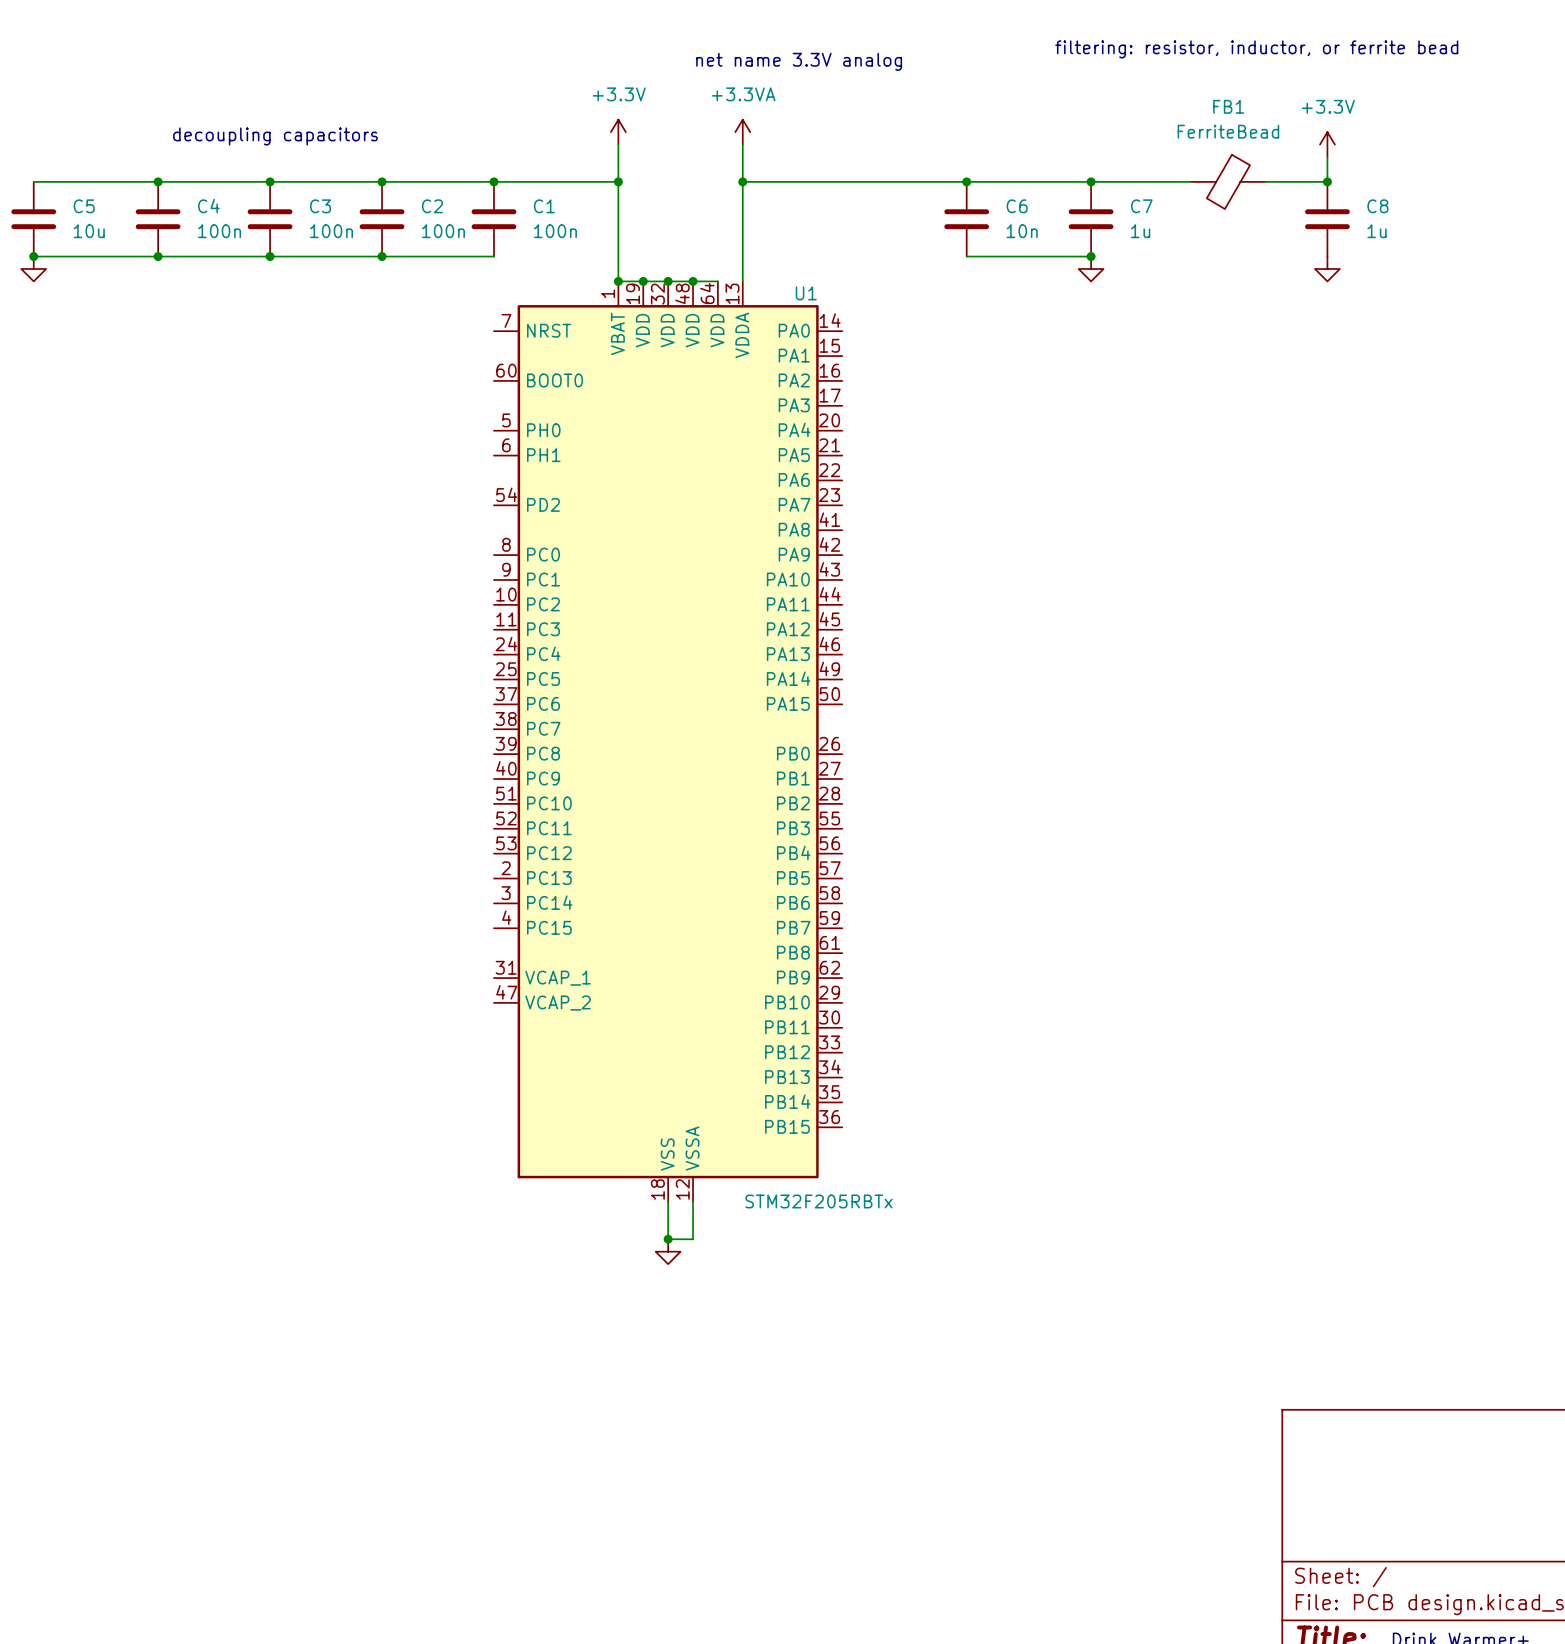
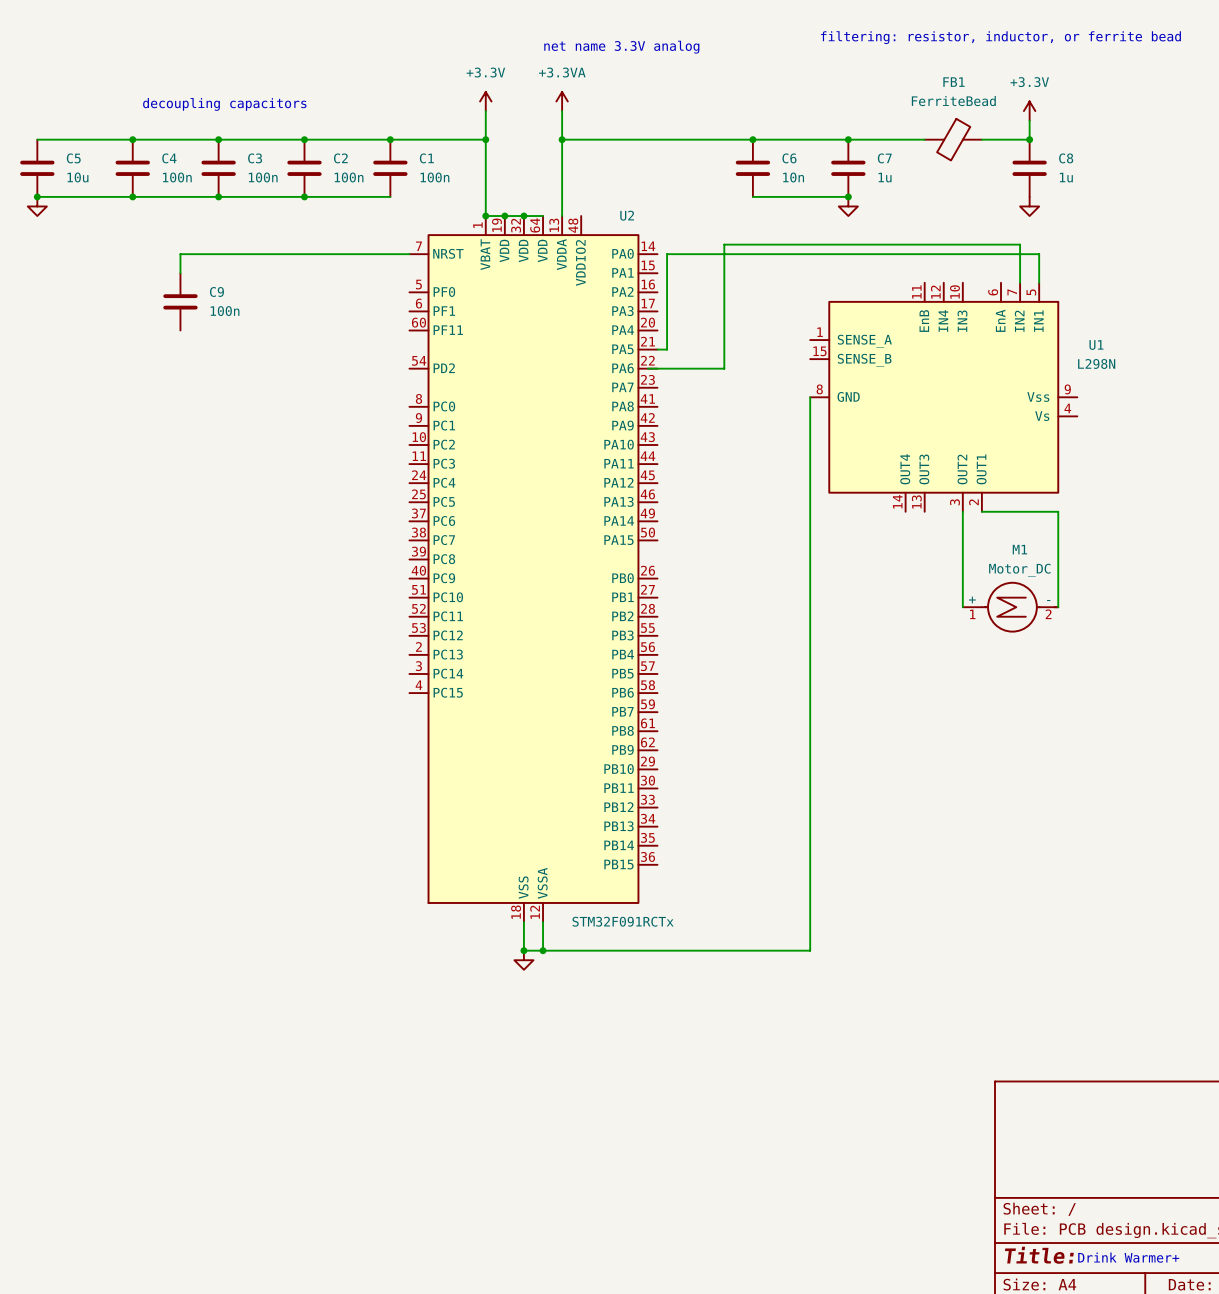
power symbol position: +3.3VA (742, 132) -> +3.3VA (562, 101)
wire: (742, 144) (742, 281) -> none
wire: none -> (562, 139) (581, 139)
junction position: (742, 181) -> (562, 139)
U1 symbol: [493, 281, 843, 1202] -> [810, 282, 1078, 512]
wire: (693, 281) (717, 281) -> (562, 111) (562, 216)
junction: (693, 281) -> none
U1 name position: U1 (806, 293) -> U1 (1096, 344)
wire: none -> (409, 254) (180, 254) (180, 273)
wire: none -> (1020, 282) (1020, 244) (724, 244) (724, 368) (647, 368)
wire: none -> (1039, 282) (1039, 254) (667, 254) (667, 349) (657, 349)
C9: none -> 100n (180, 301)
wire: none -> (810, 397) (810, 950) (543, 950)
wire: none -> (962, 511) (962, 607)
wire: none -> (981, 511) (1058, 511) (1058, 607)
U2: none -> STM32F091RCTx (533, 569)
M1: none -> Motor_DC (1010, 607)
U1 value: STM32F205RBTx (818, 1201) -> L298N (1096, 363)
junction: none -> (543, 950)

